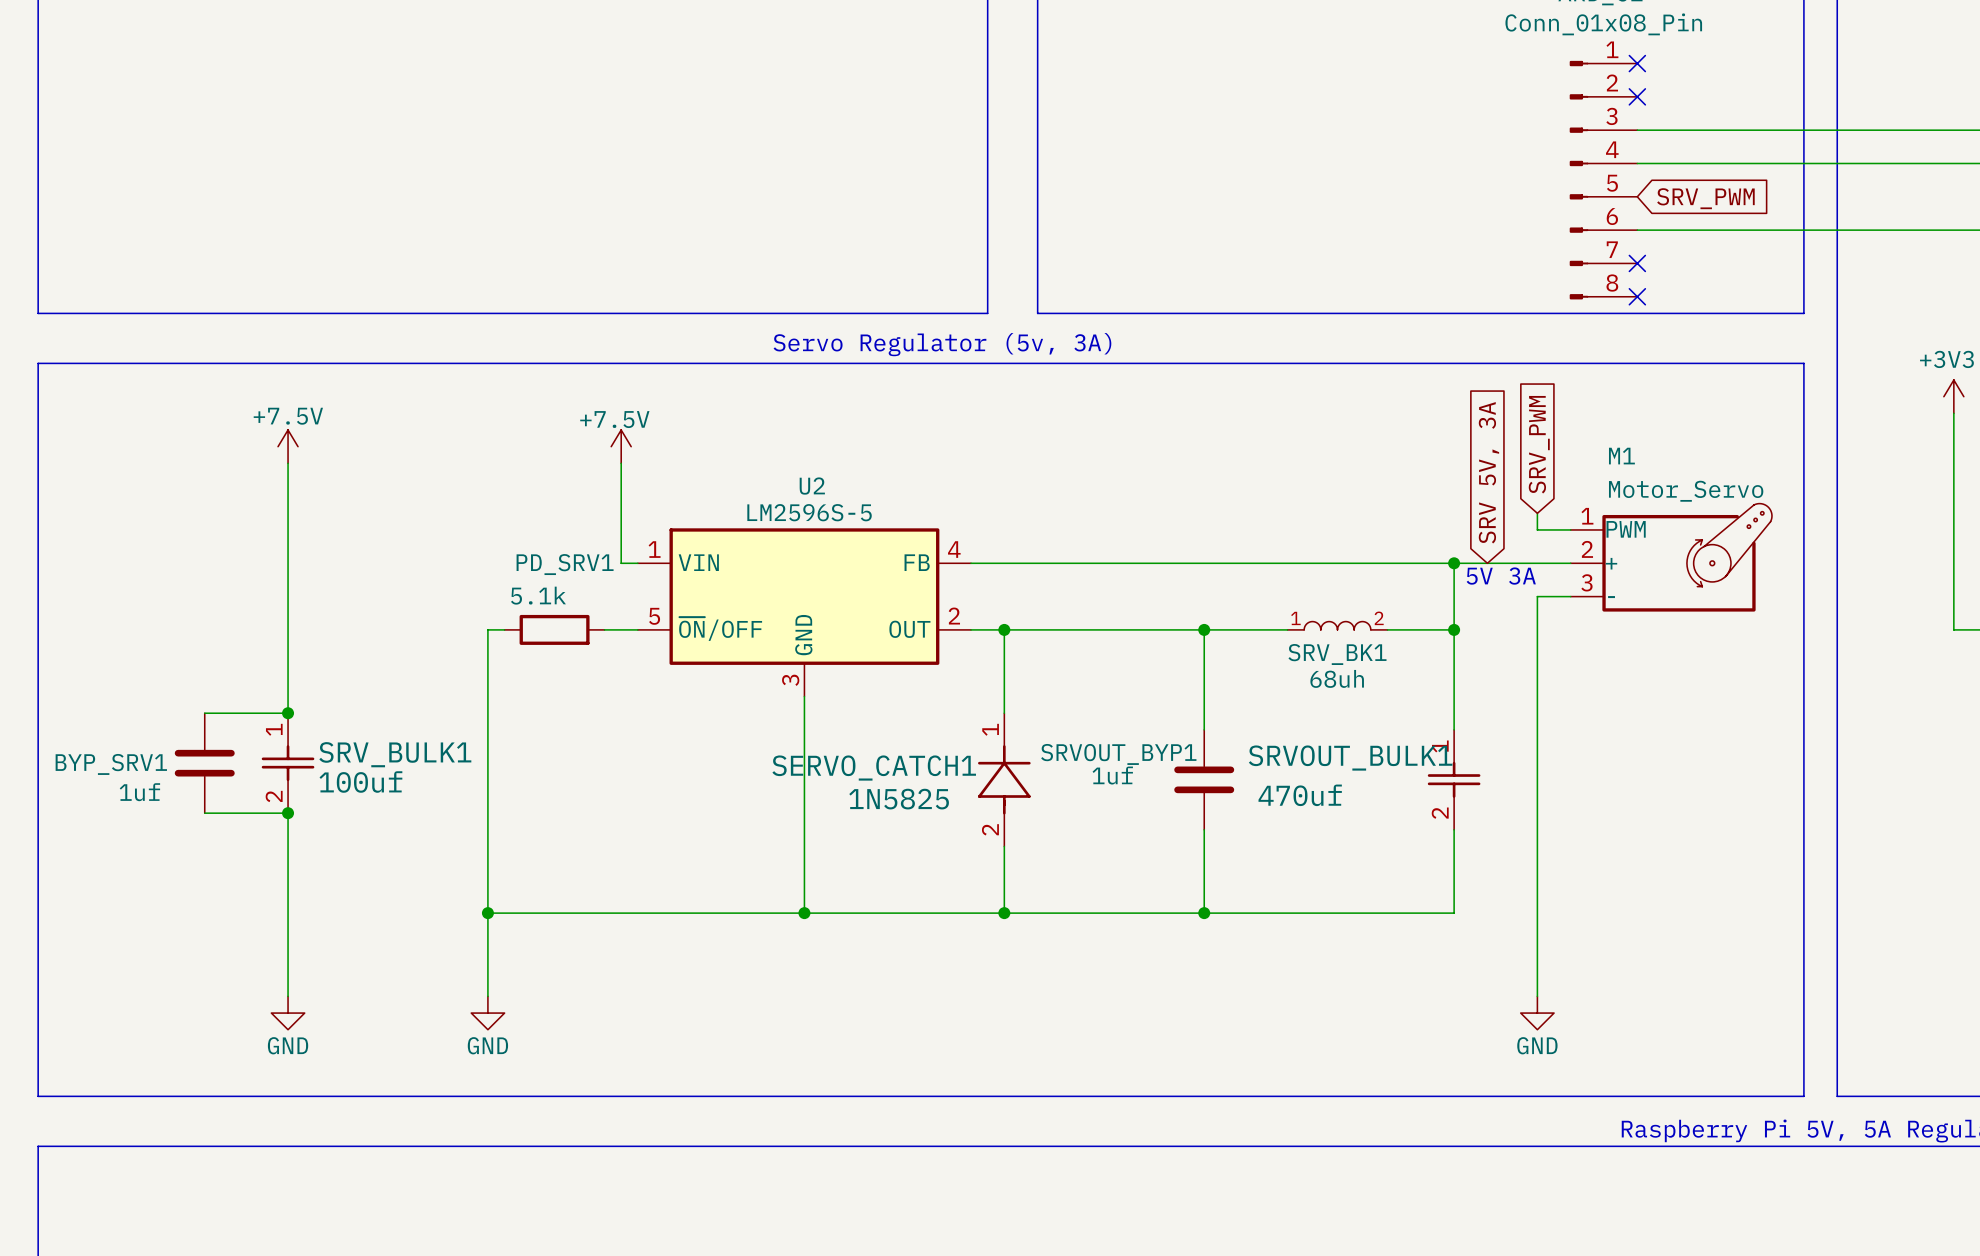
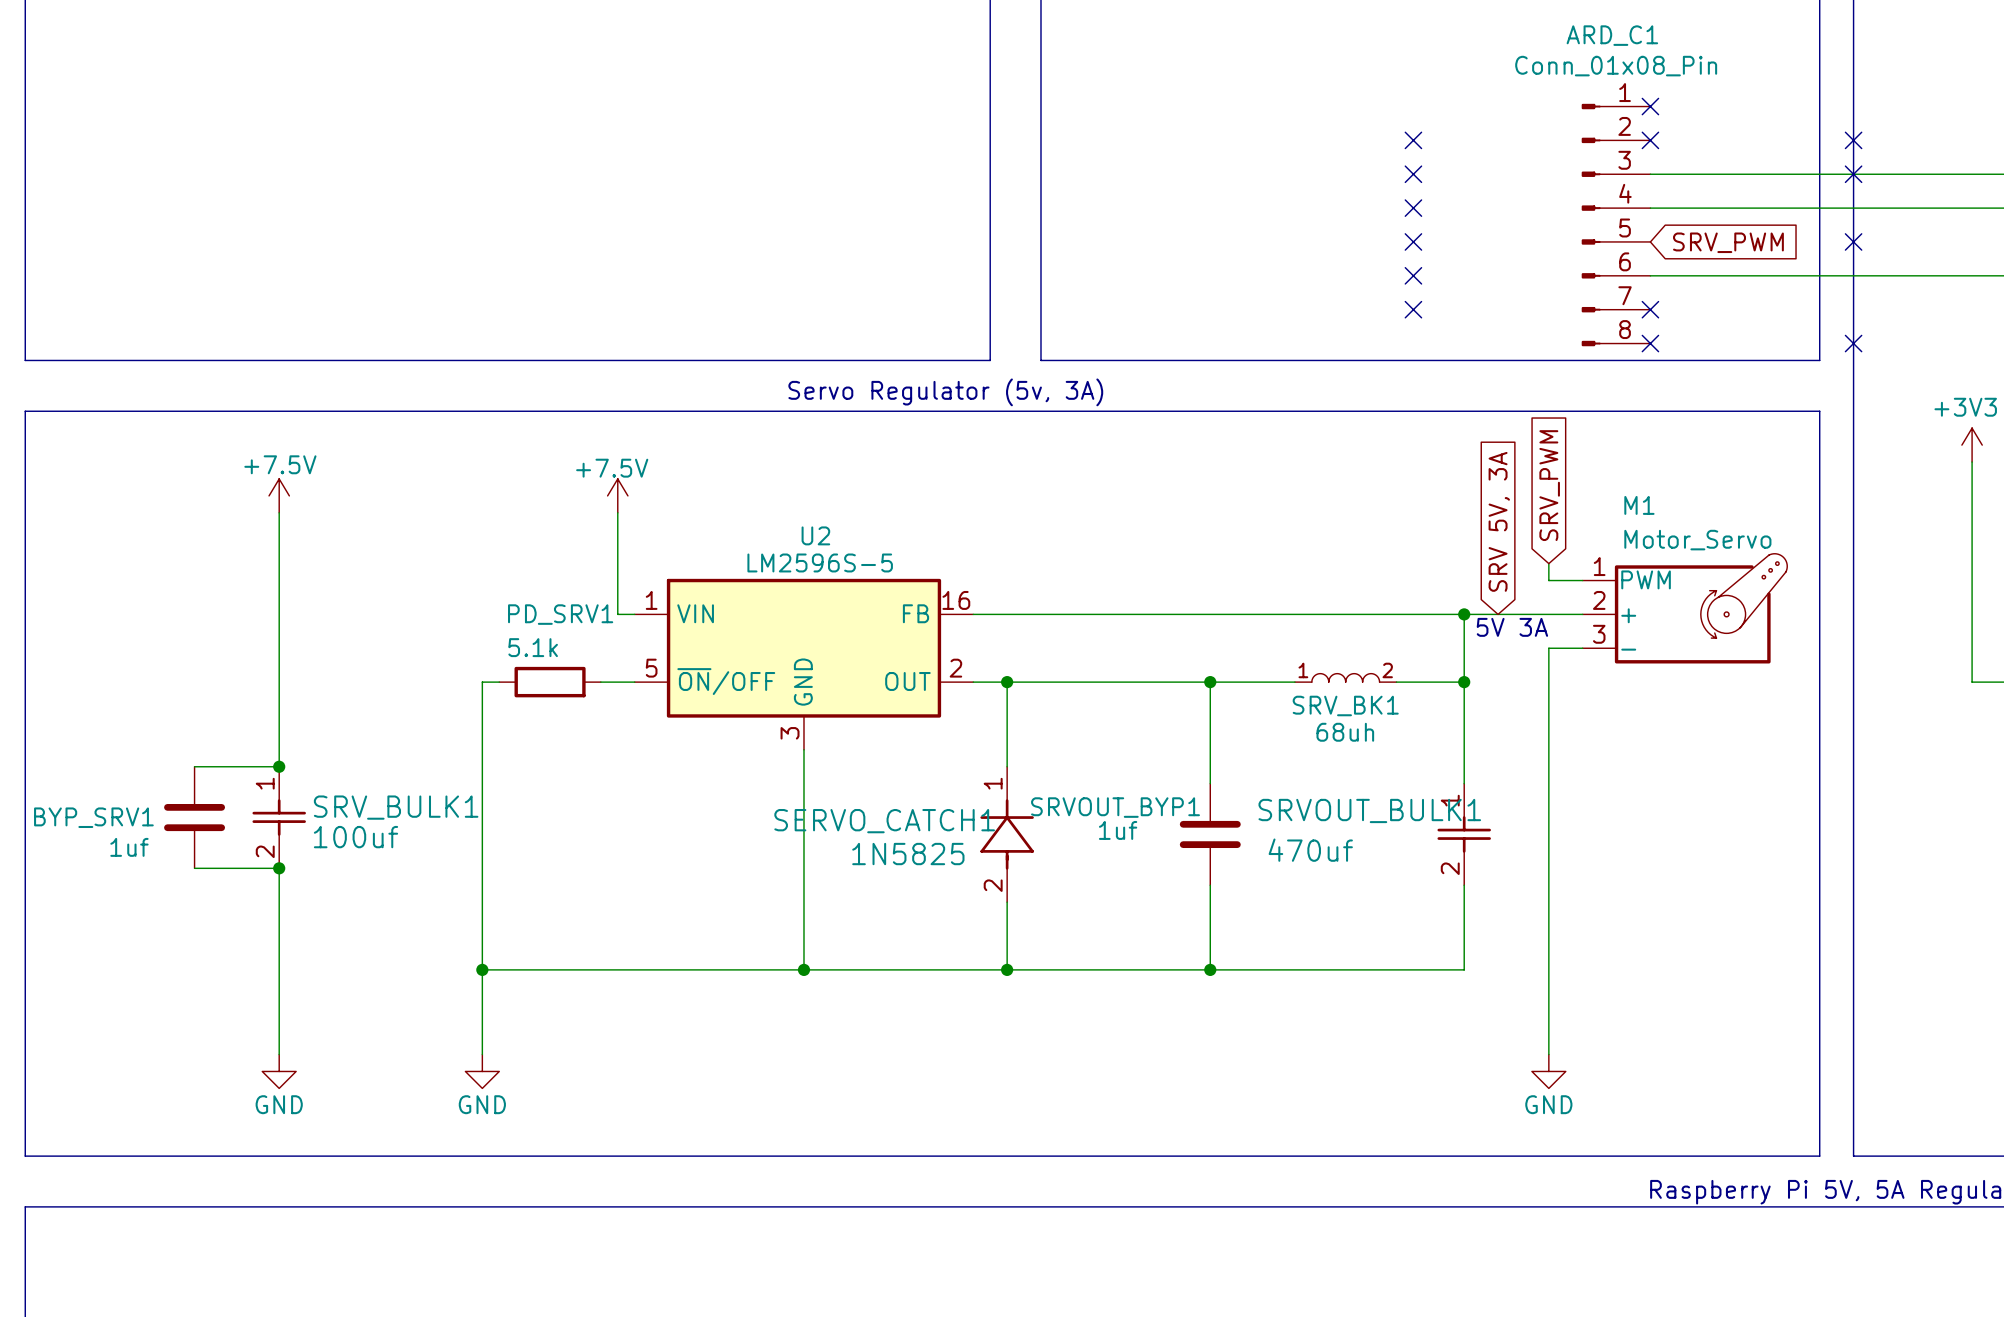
no-connect mark: none -> (1413, 140)
no-connect mark: none -> (1853, 140)
no-connect mark: none -> (1413, 174)
no-connect mark: none -> (1853, 174)
no-connect mark: none -> (1413, 208)
no-connect mark: none -> (1413, 241)
no-connect mark: none -> (1853, 241)
no-connect mark: none -> (1413, 275)
no-connect mark: none -> (1413, 309)
no-connect mark: none -> (1853, 343)
U2 pin number: 4 (954, 549) -> 16 (956, 600)

